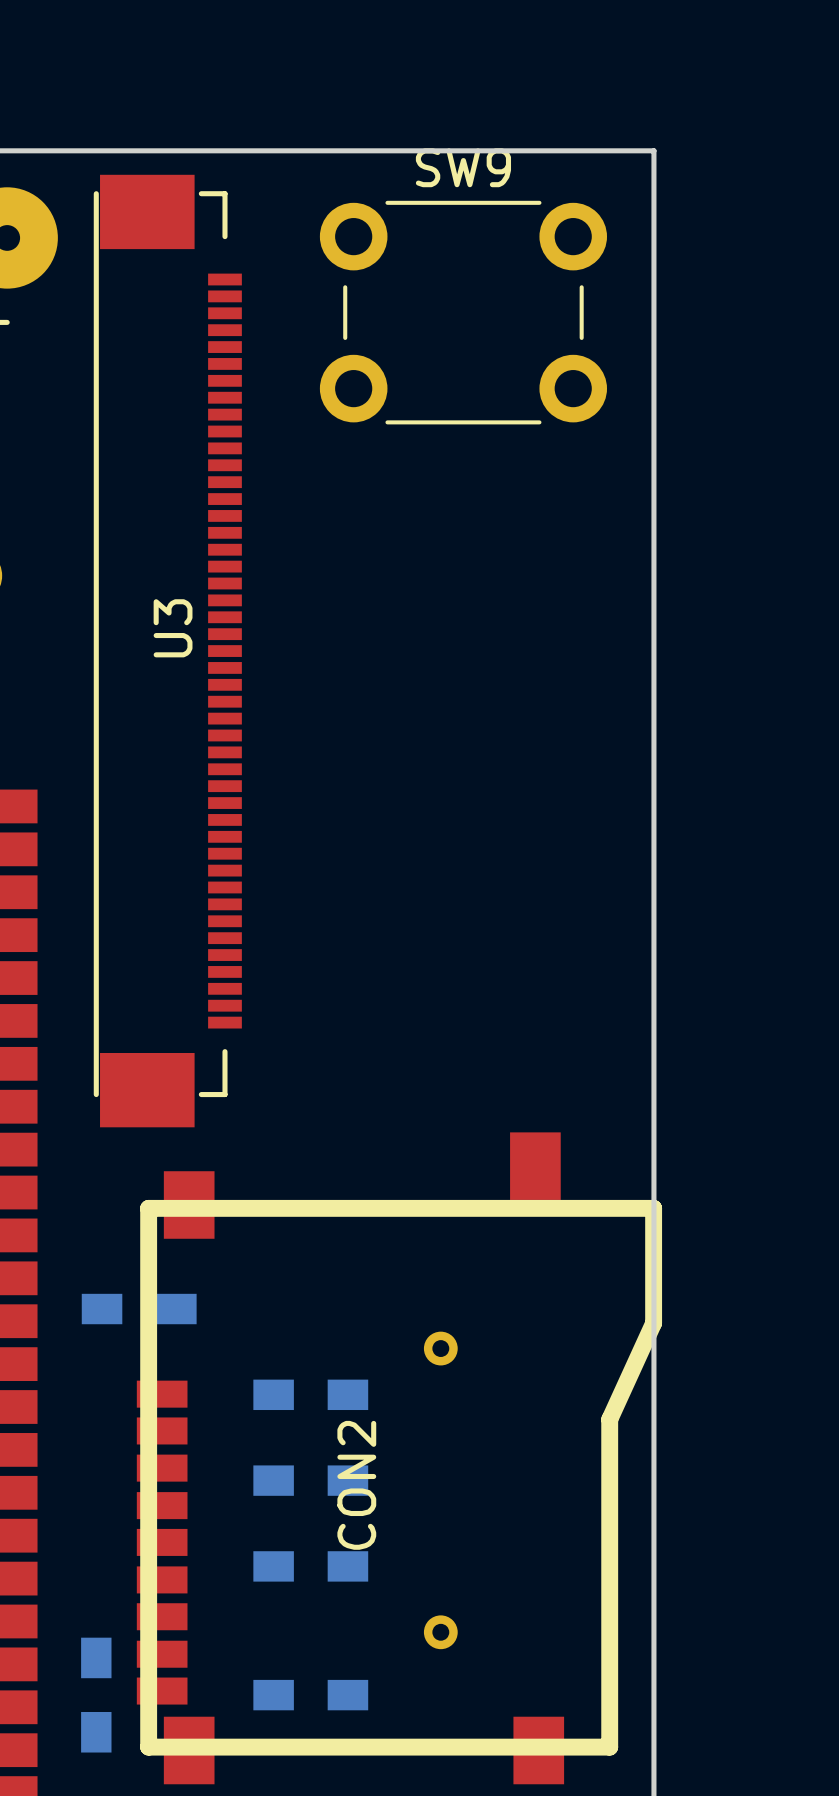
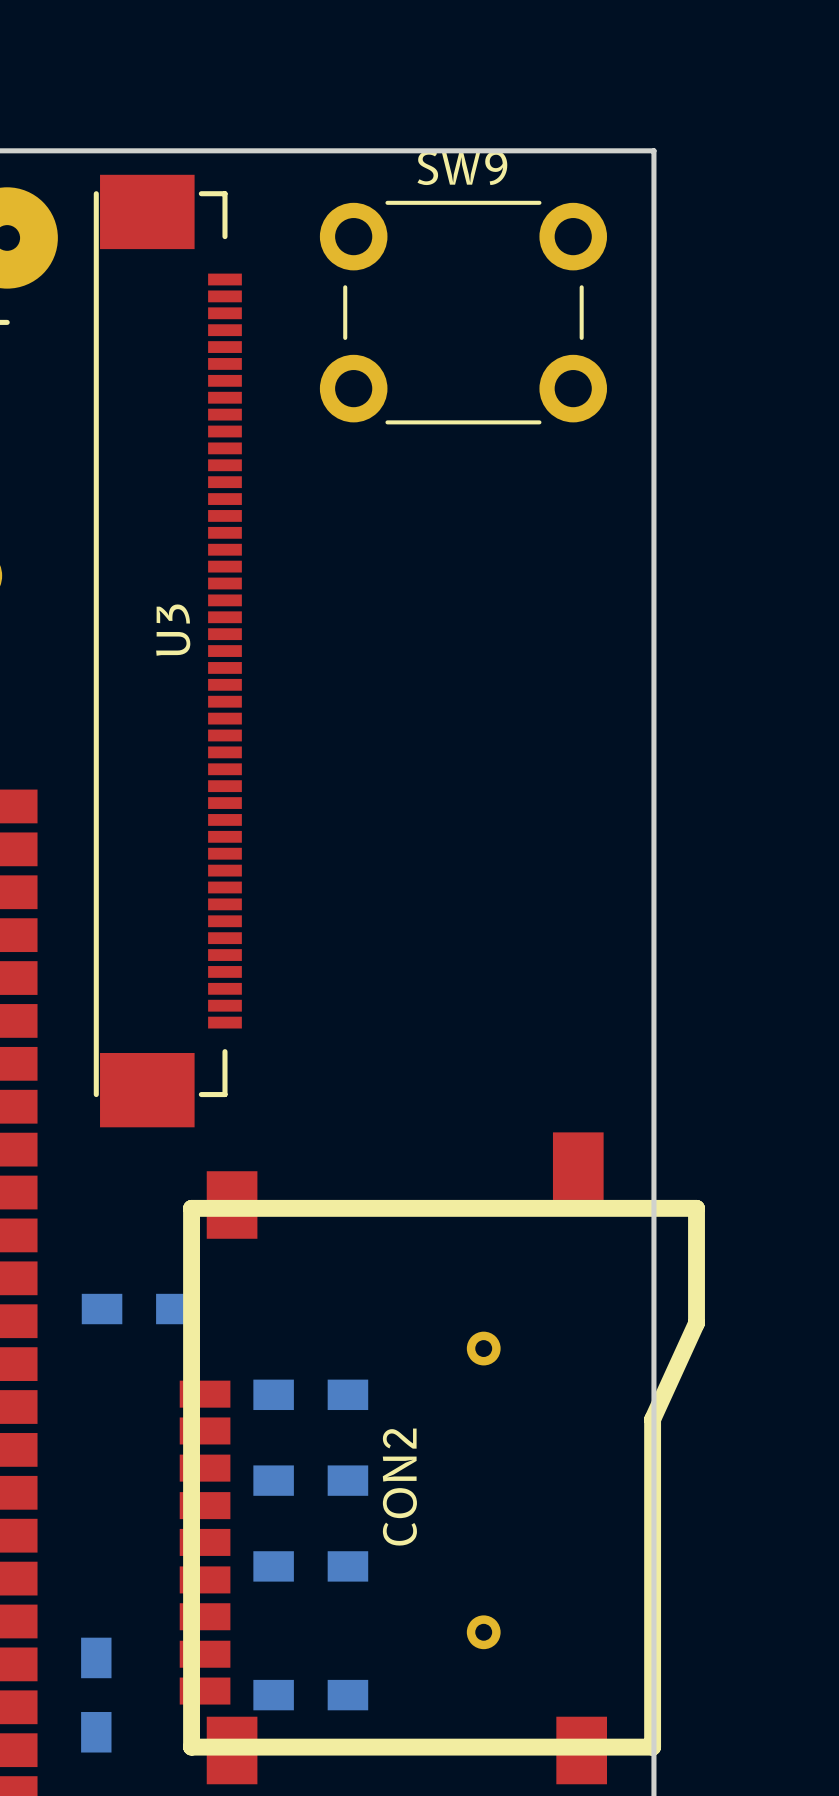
CON2 position: (399, 1458) -> (442, 1458)

